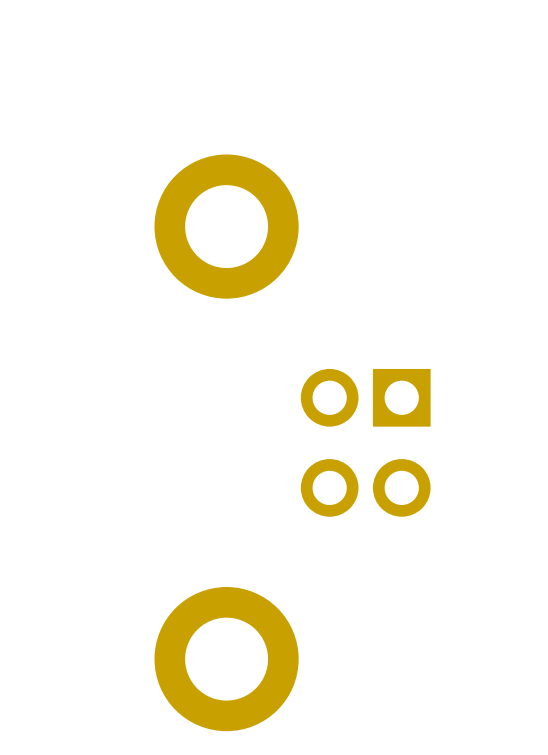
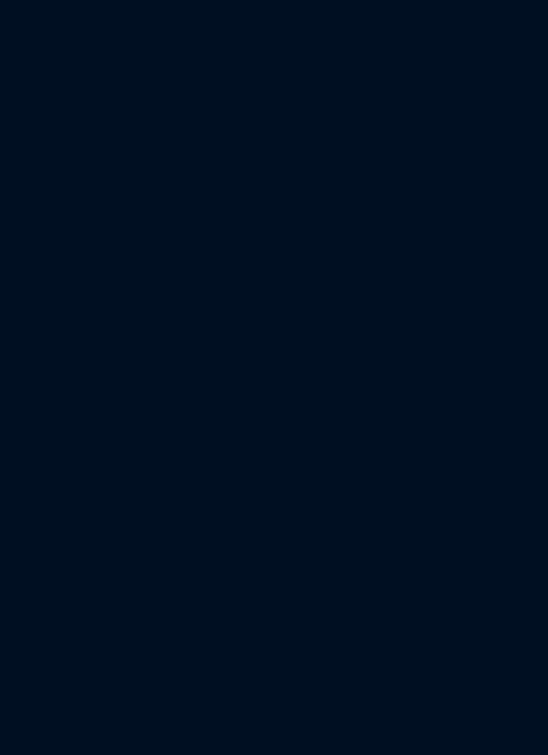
part: (292, 442) -> none

